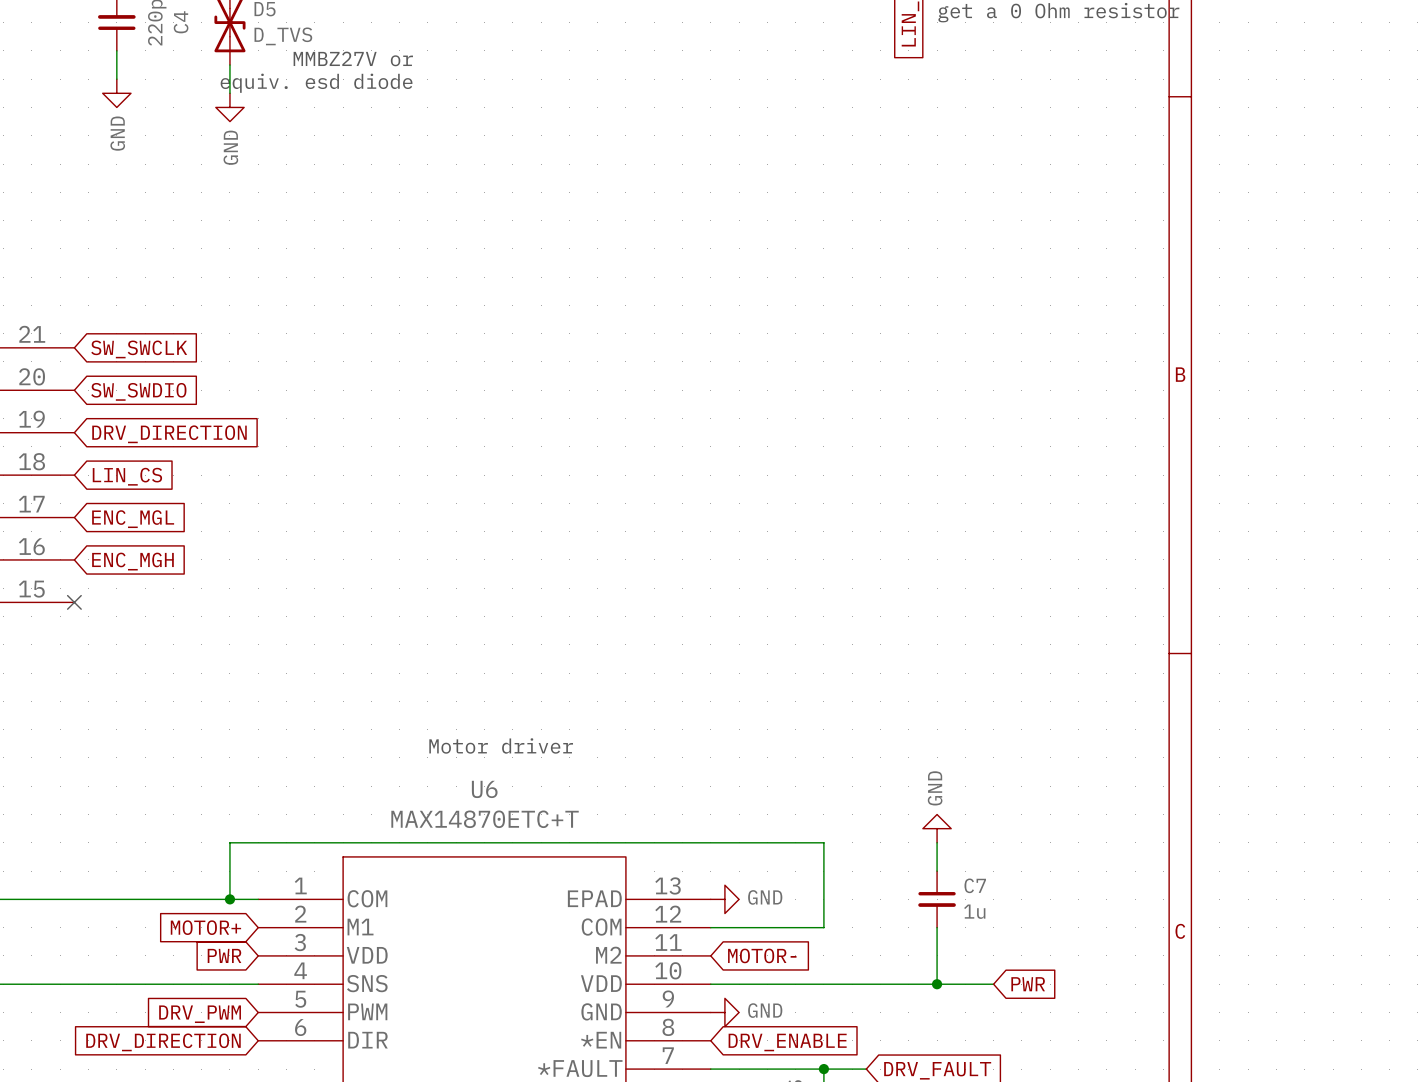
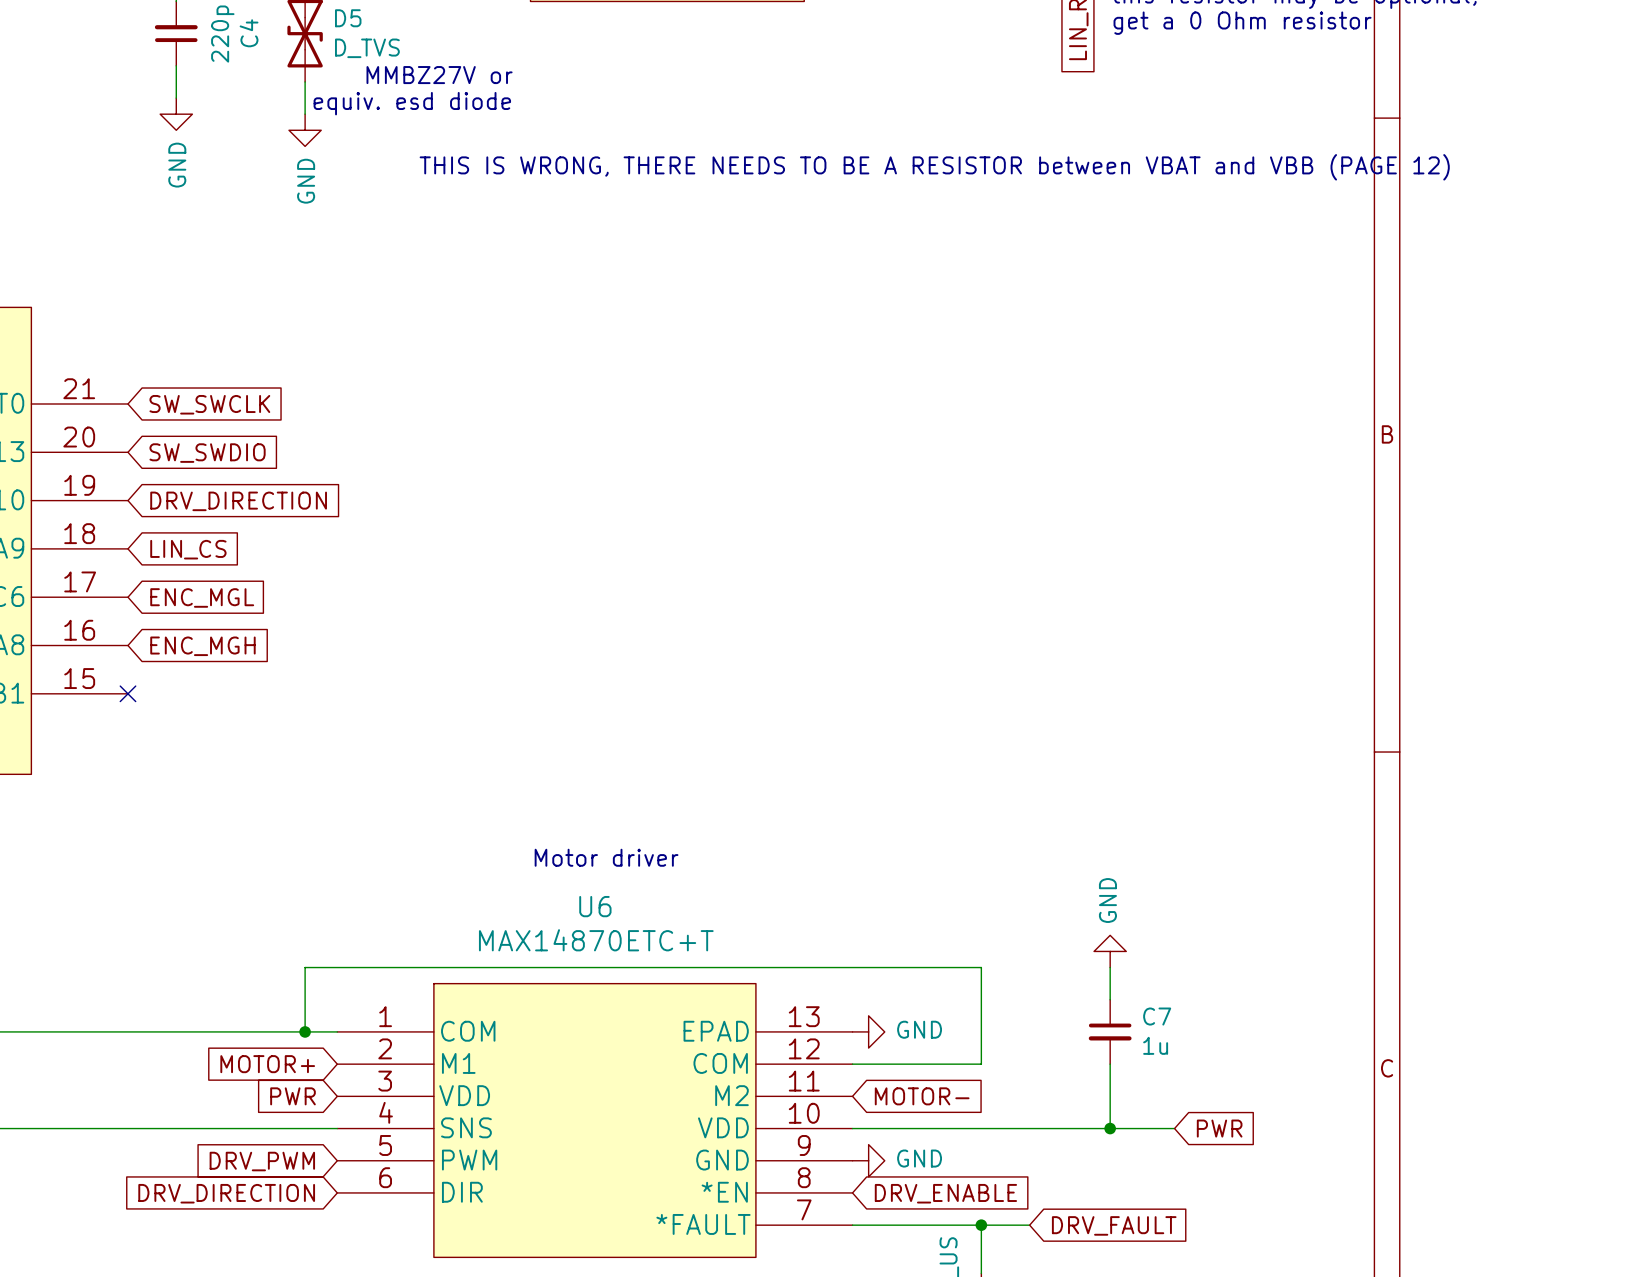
text: none -> THIS IS WRONG, THERE NEEDS TO BE A RESISTOR between VBAT and VBB (PAGE 12) (934, 167)

